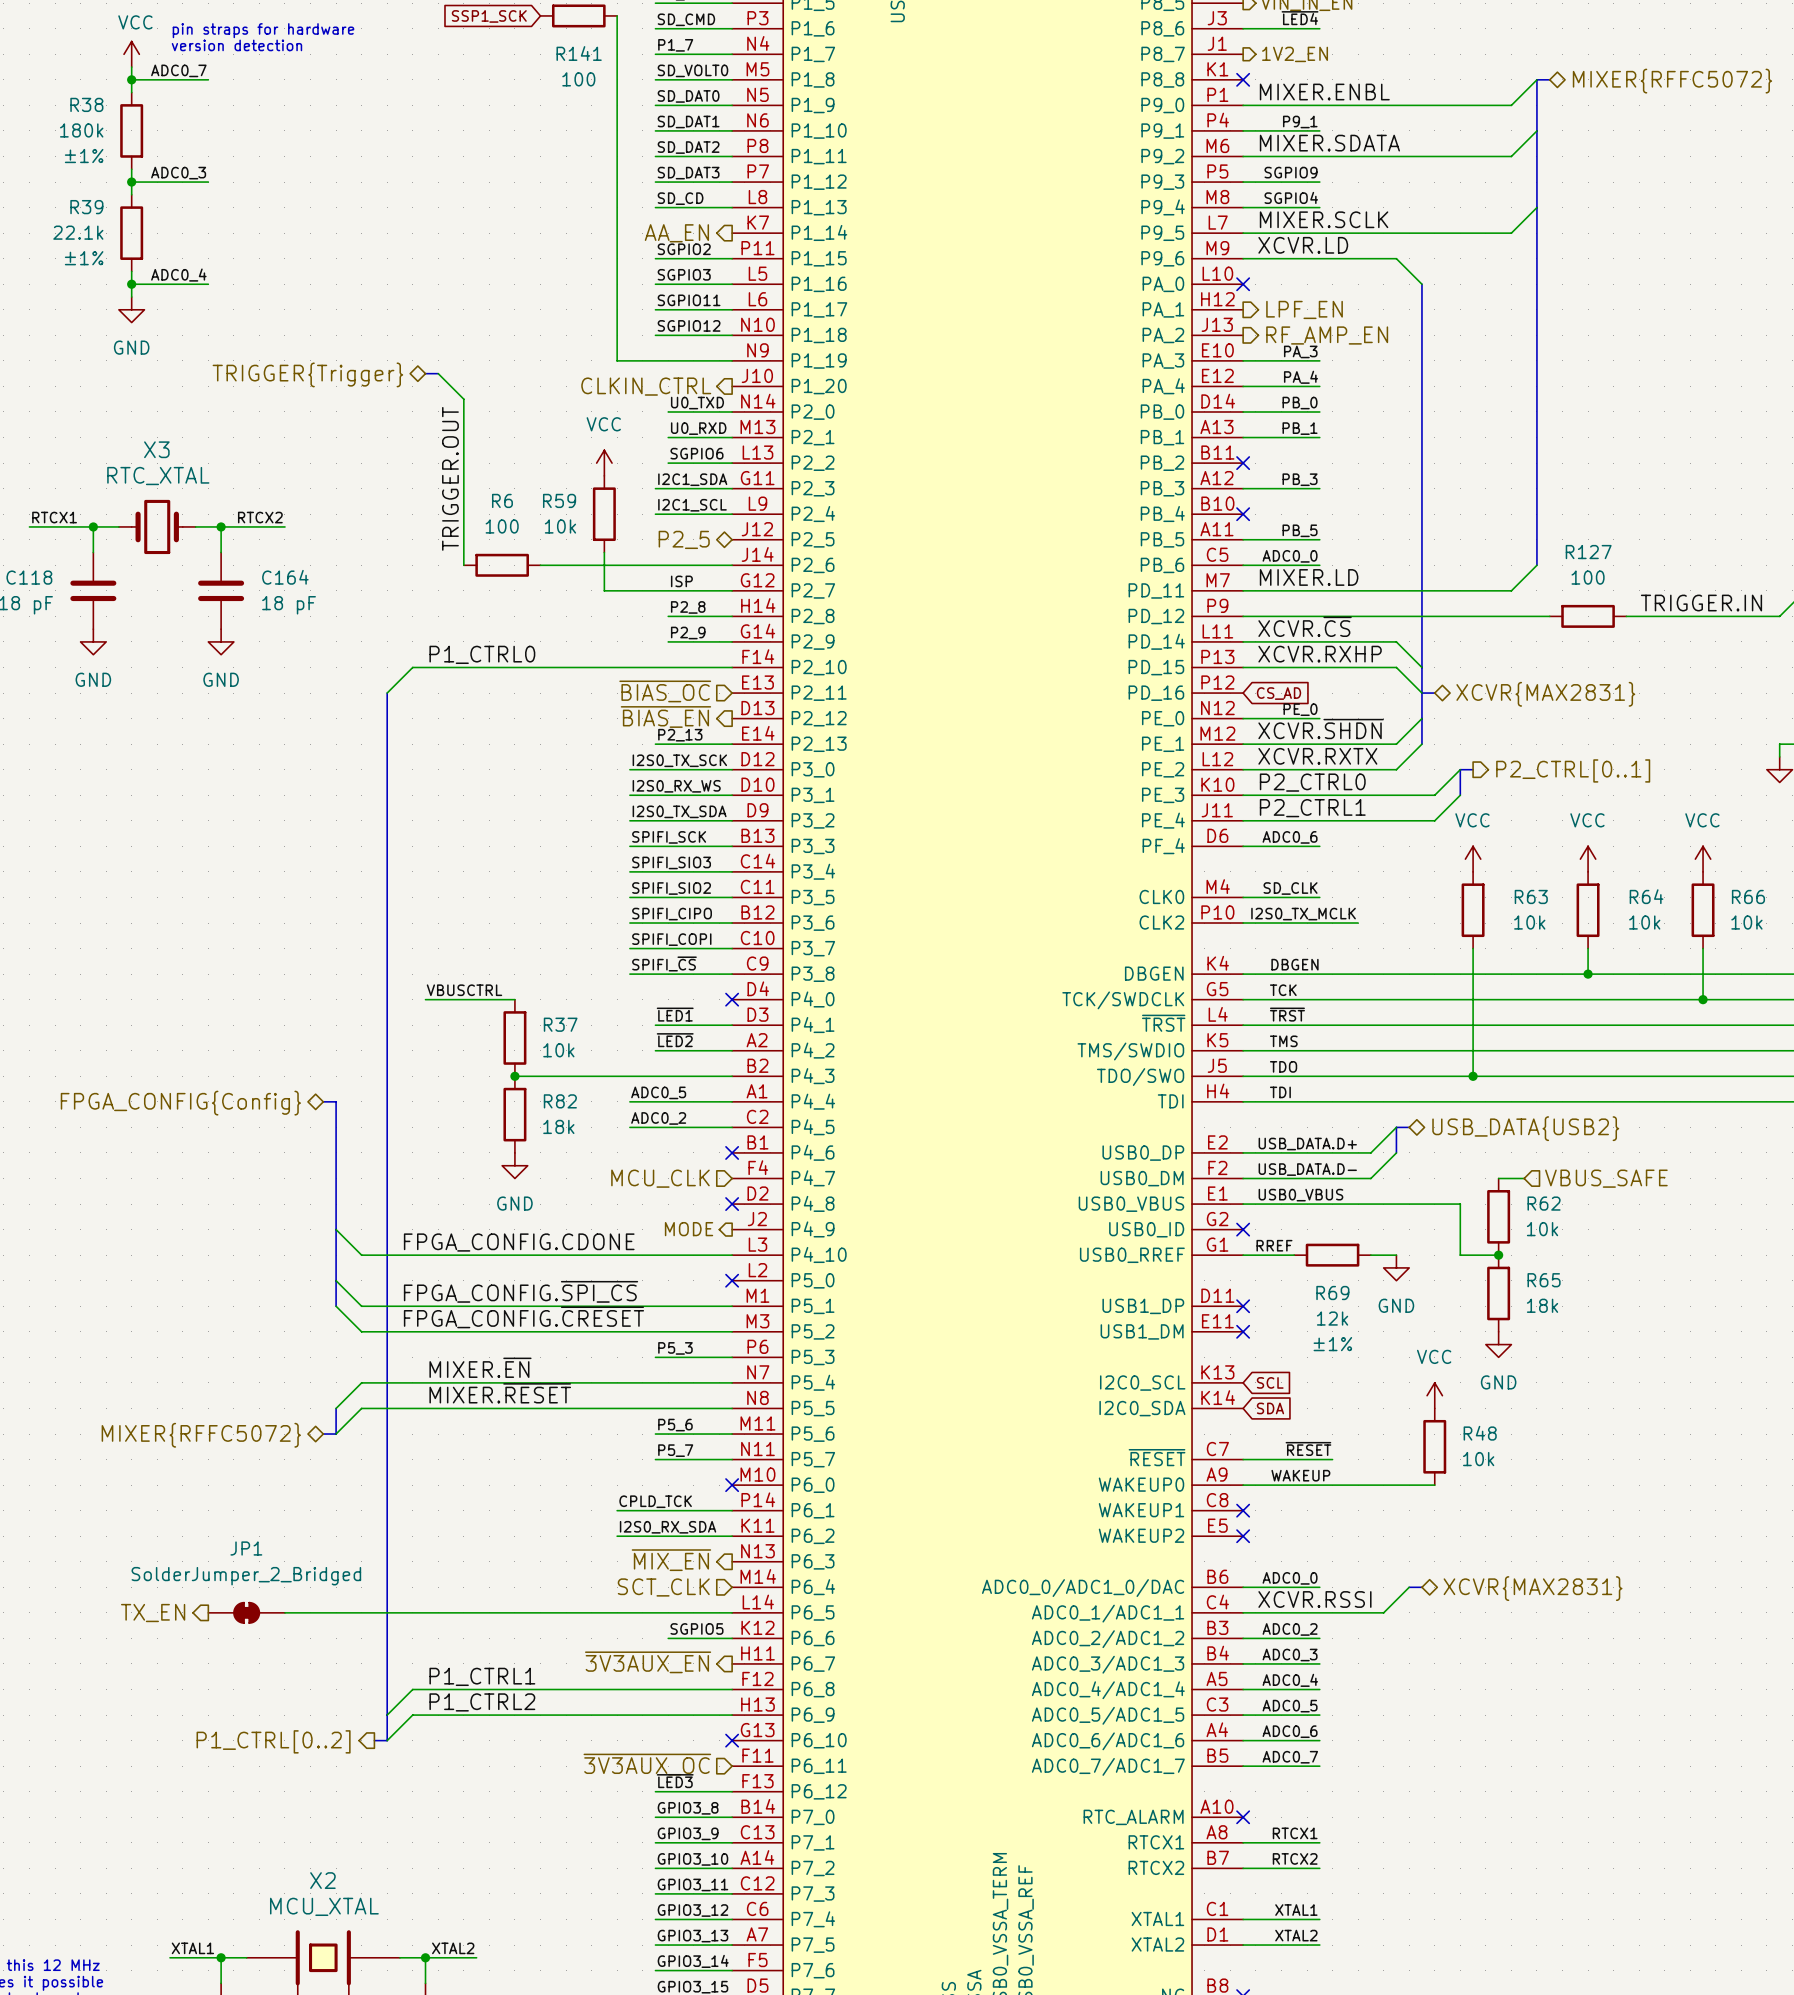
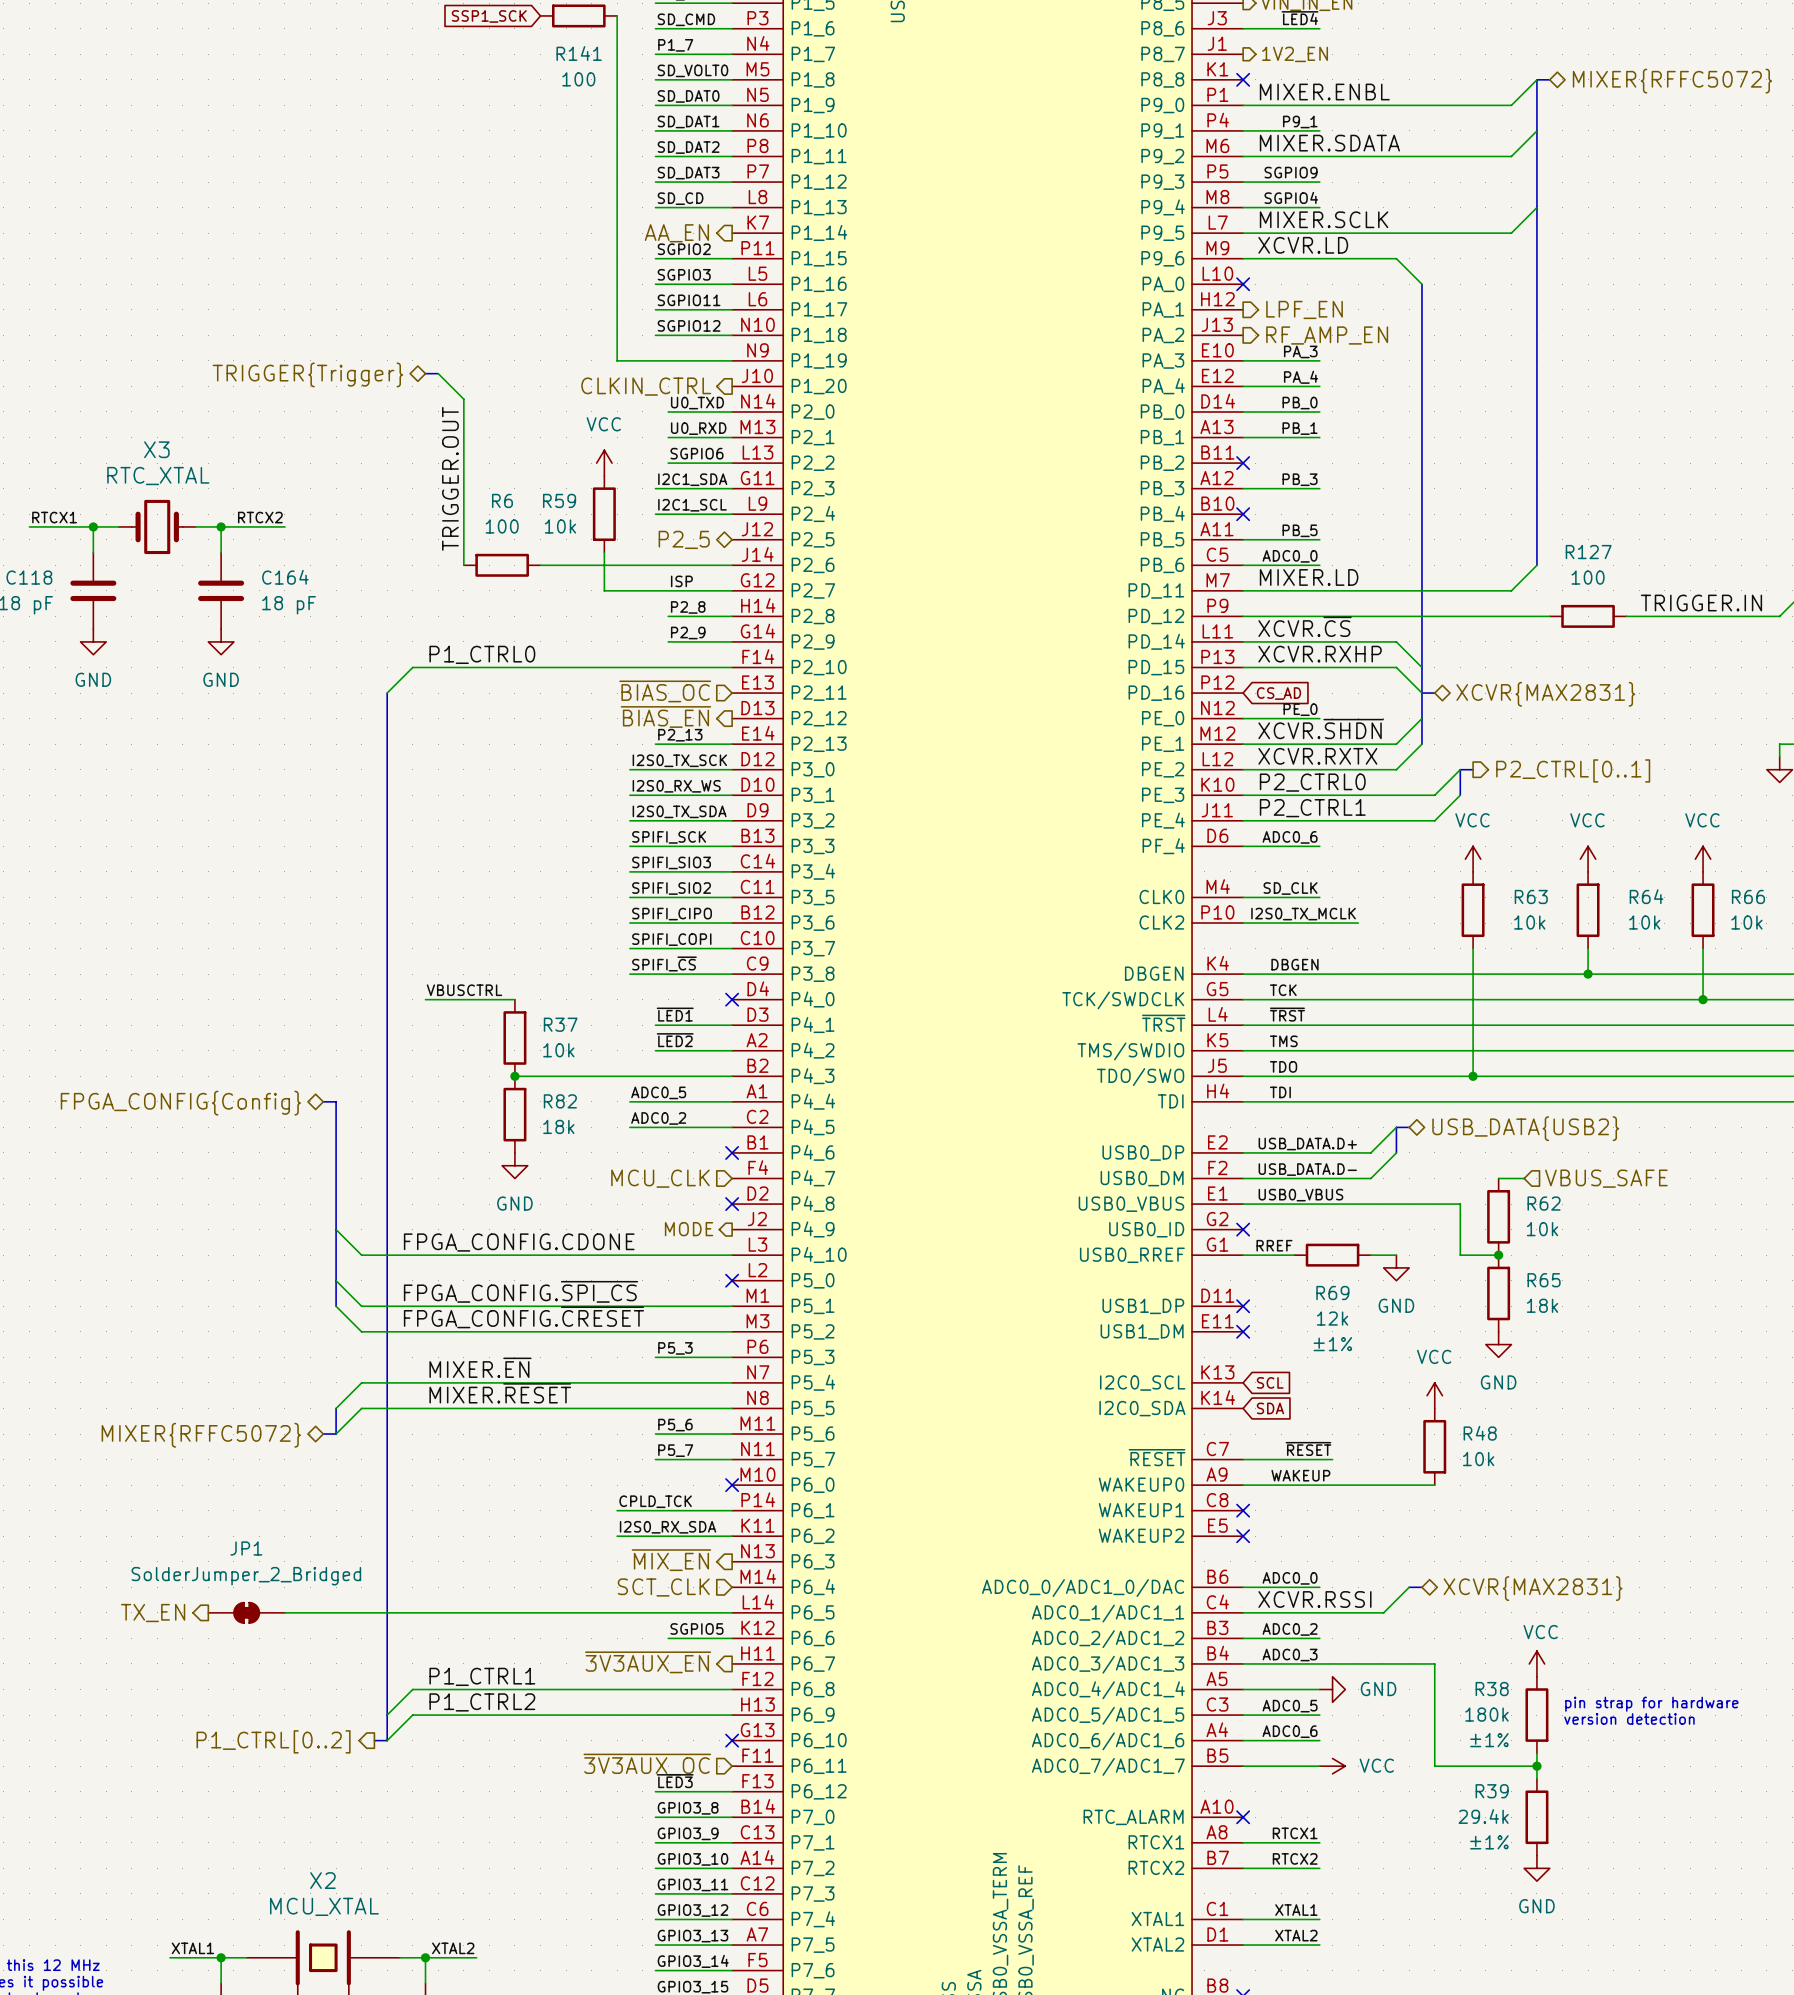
text: pin straps for hardware (263, 30) -> none
text: version detection (236, 45) -> none
power symbol: VCC (131, 54) -> none
wire: (131, 67) (131, 92) -> none
label: ADC0_7 (178, 70) -> none
wire: (131, 79) (208, 79) -> none
junction: (131, 79) -> none
R38 position: (131, 130) -> (1536, 1715)
wire: (131, 169) (131, 194) -> none
label: ADC0_3 (178, 173) -> none
wire: (131, 182) (208, 182) -> none
junction: (131, 182) -> none
R39 value: 22.1k (78, 232) -> 29.4k (1483, 1816)
R39 position: (131, 233) -> (1536, 1817)
wire: (131, 271) (131, 297) -> none
label: ADC0_4 (178, 275) -> none
wire: (131, 284) (208, 284) -> none
junction: (131, 284) -> none
power symbol: GND (131, 309) -> none
wire: none -> (1319, 1663) (1434, 1663) (1434, 1766) (1536, 1766)
power symbol: none -> VCC (1536, 1663)
label: ADC0_4 (1290, 1680) -> none
power symbol: none -> GND (1332, 1689)
text: none -> pin strap for hardware (1651, 1704)
text: none -> version detection (1629, 1718)
wire: none -> (1536, 1753) (1536, 1778)
label: ADC0_7 (1290, 1757) -> none
power symbol: none -> VCC (1332, 1766)
junction: none -> (1536, 1766)
power symbol: none -> GND (1536, 1868)

